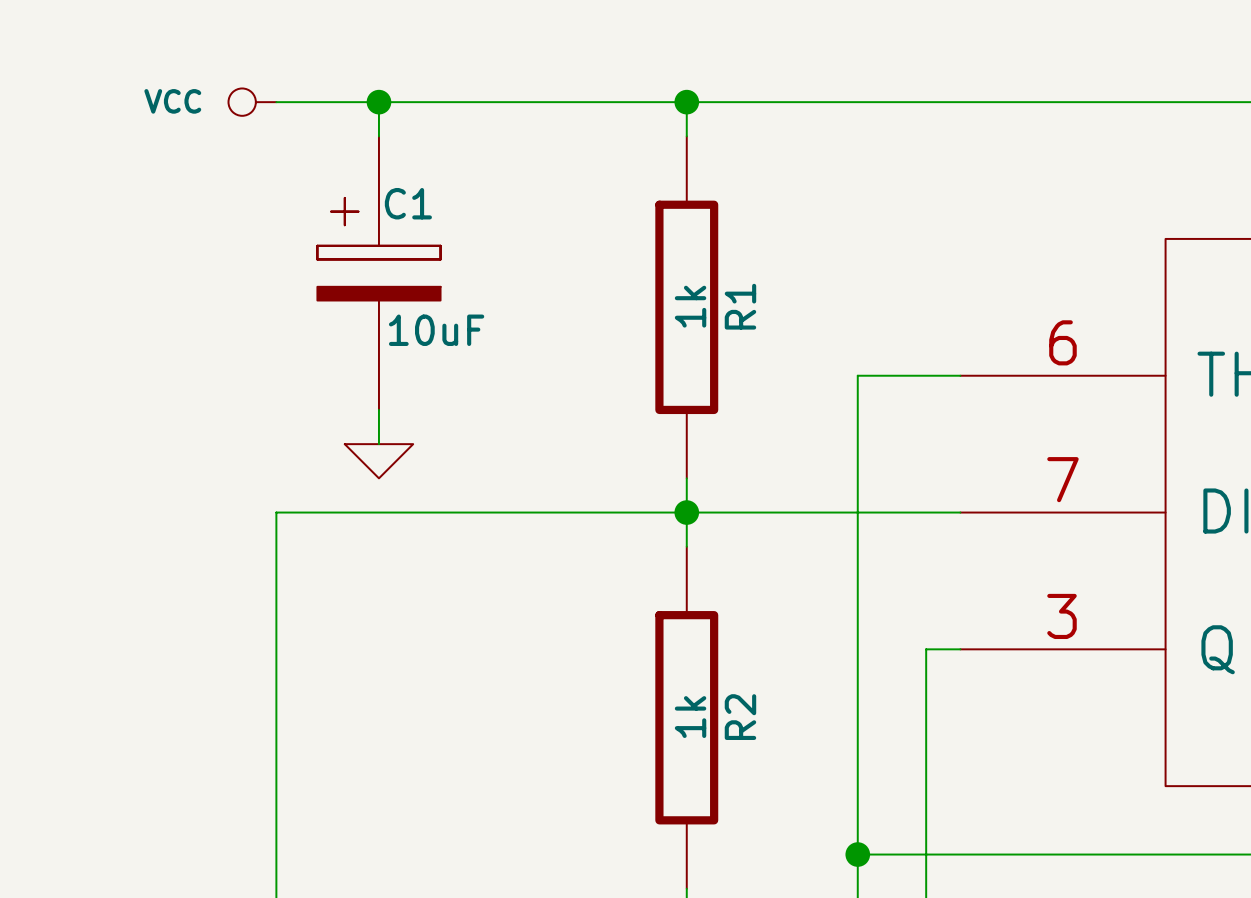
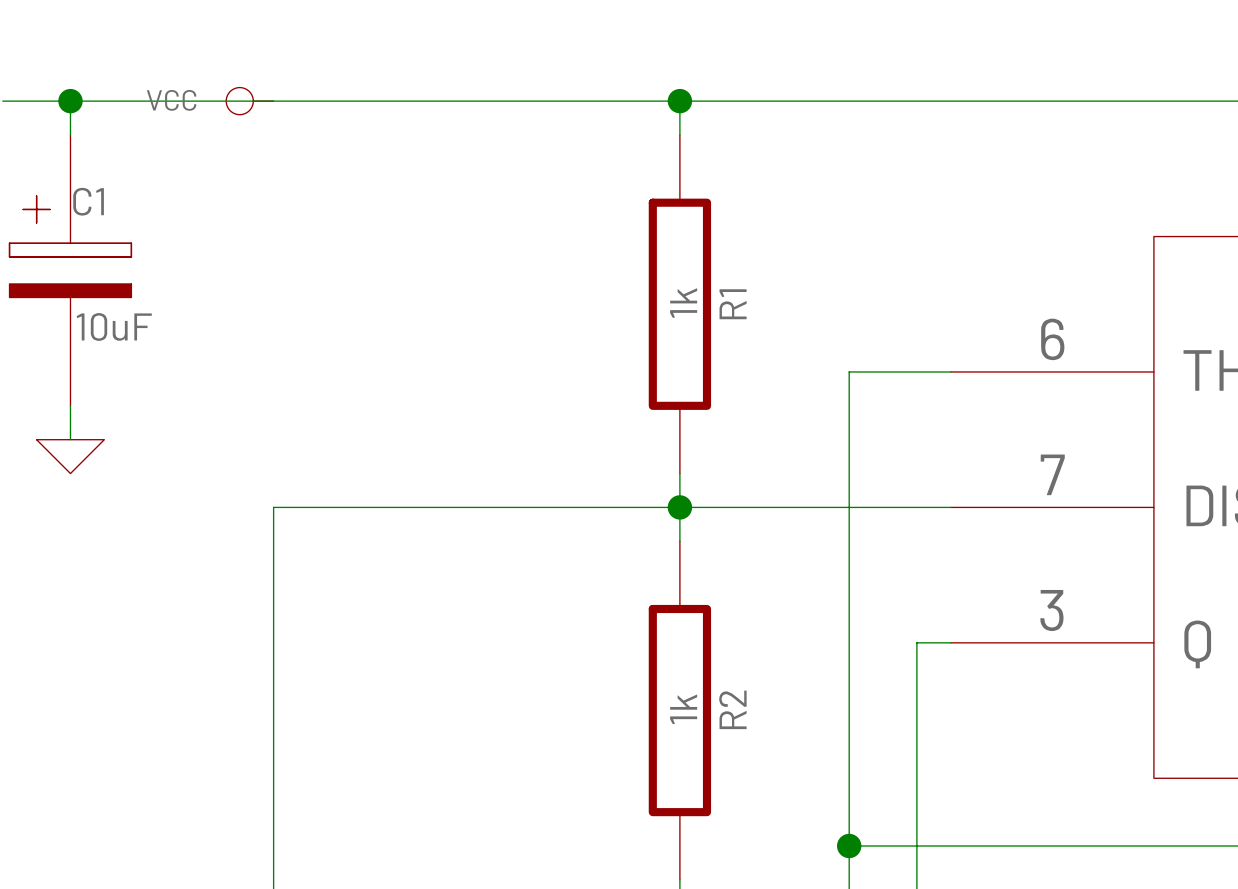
wire: none -> (2, 101) (273, 101)
junction: none -> (70, 101)
wire: (378, 102) (378, 136) -> (70, 101) (70, 134)
junction: (378, 102) -> none
C1 position: (378, 273) -> (70, 270)
wire: (378, 409) (378, 444) -> (70, 405) (70, 439)
power symbol position: (378, 461) -> (70, 456)

